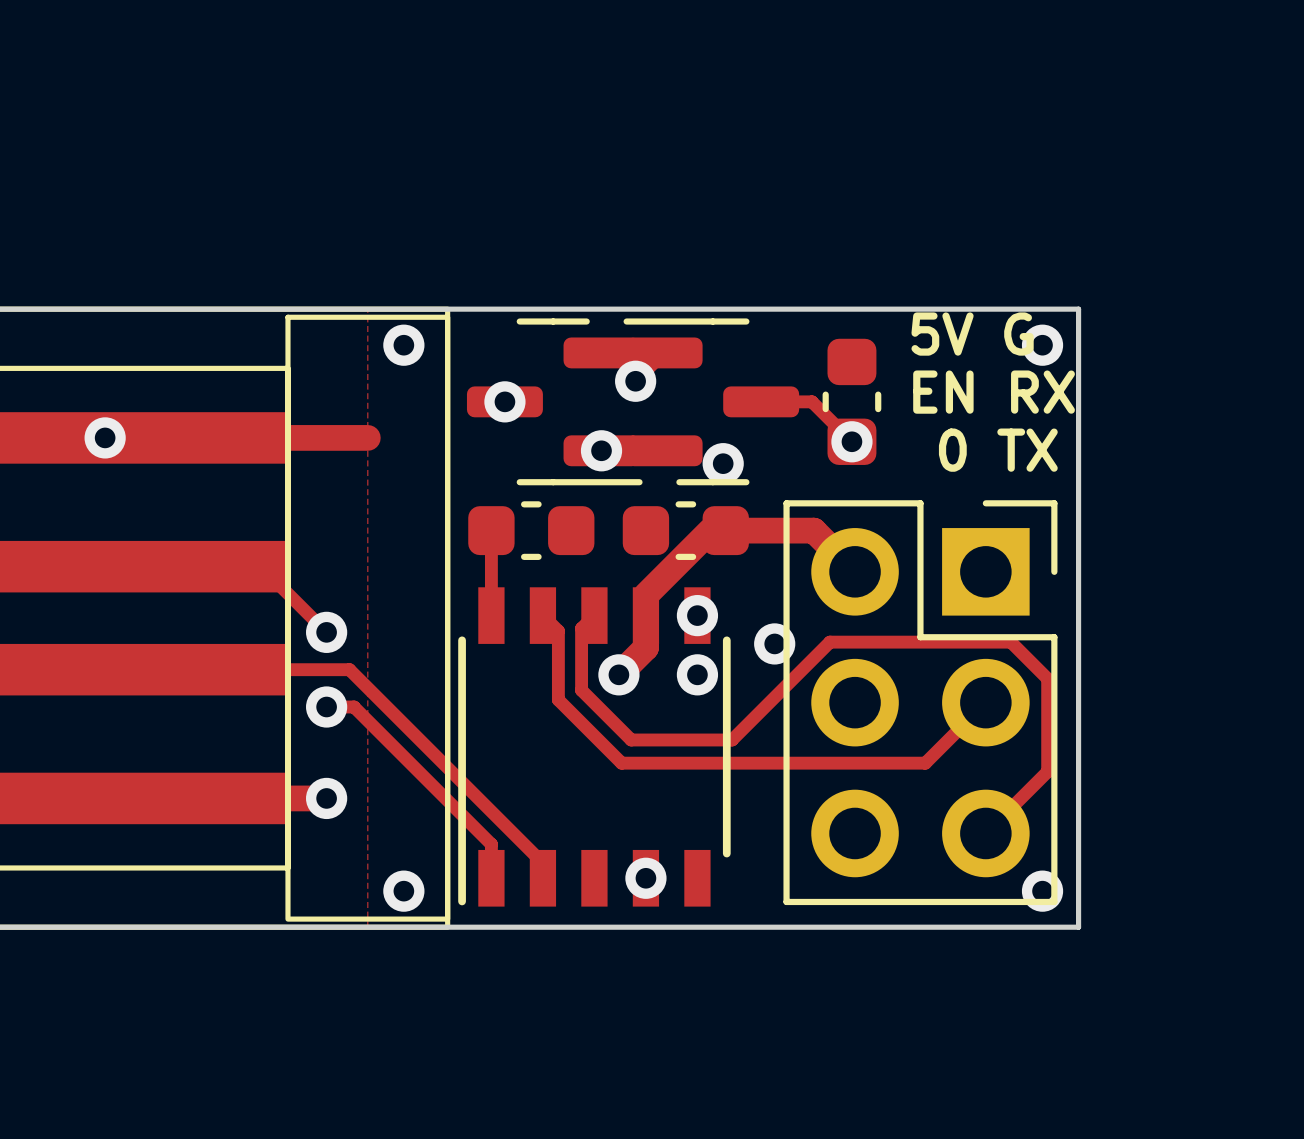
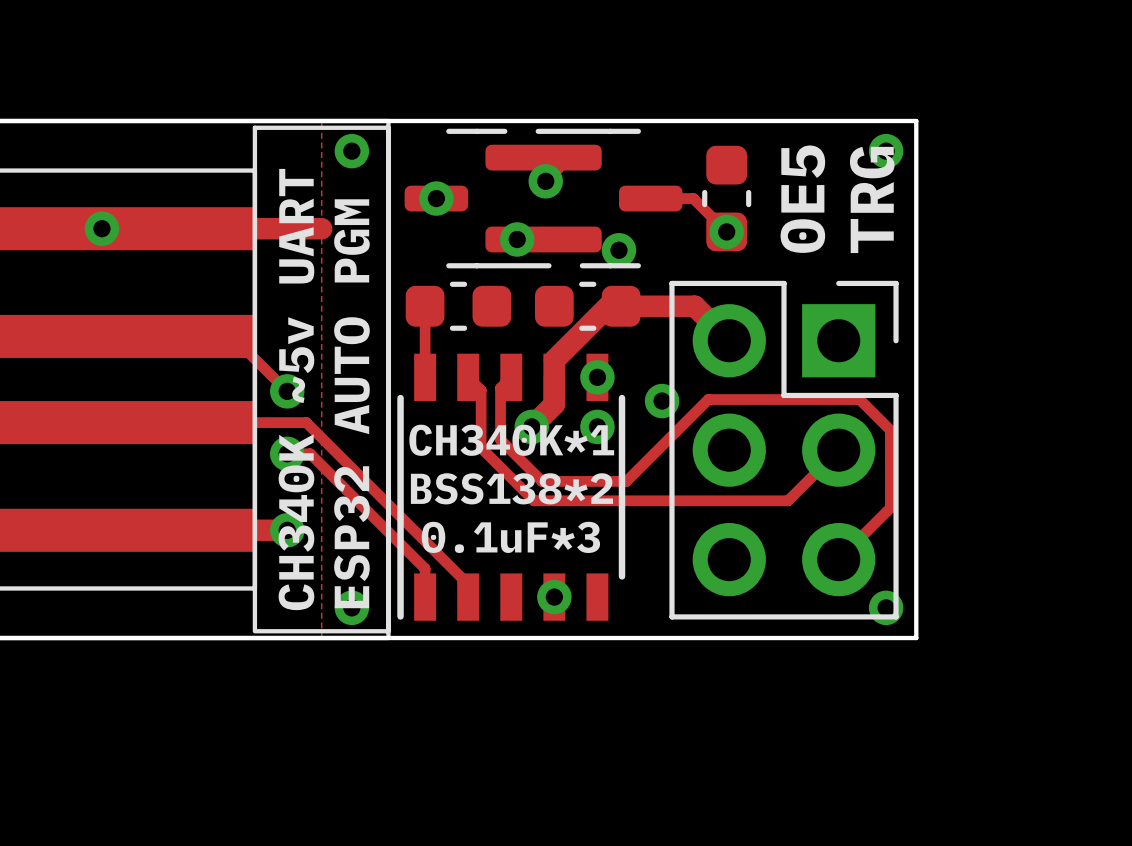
text: 5V G (972, 334) -> none
text: none -> 0E5 (802, 199)
text: EN RX (994, 392) -> none
text: none -> TRG (872, 199)
text: 0 TX (998, 450) -> none
text: none -> CH340K ~5v UART (296, 389)
text: none -> ESP32 AUTO PGM (351, 403)
text: none -> CH340K*1 (511, 440)
text: none -> BSS138*2 (511, 488)
text: none -> 0.1uF*3 (510, 537)

